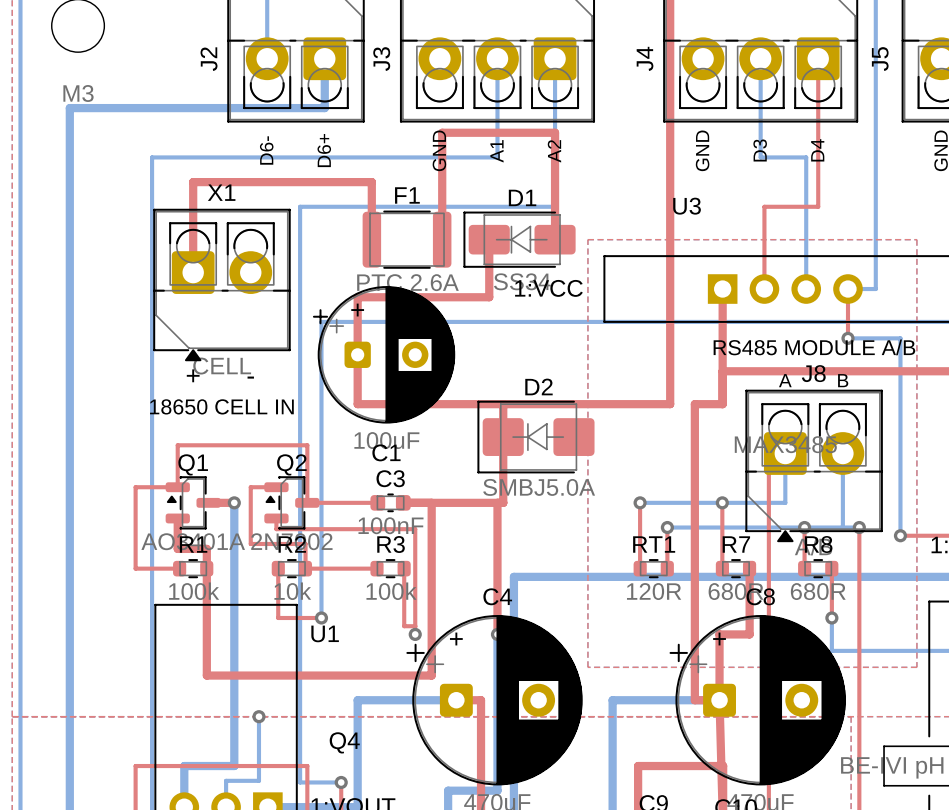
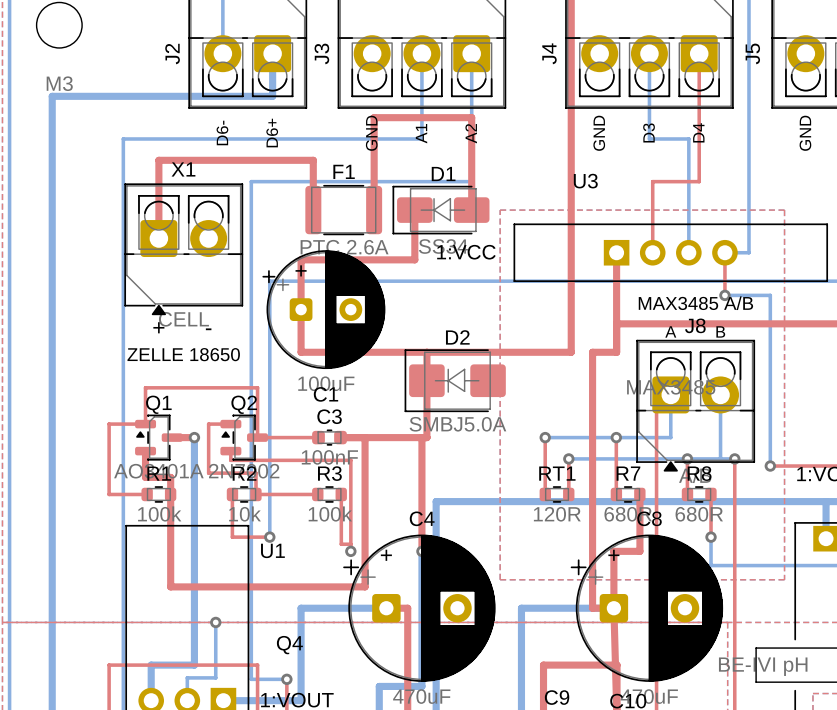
text: RS485 MODULE A/B (814, 347) -> MAX3485 A/B (695, 303)
text: 18650 CELL IN (221, 406) -> ZELLE 18650 (183, 354)

